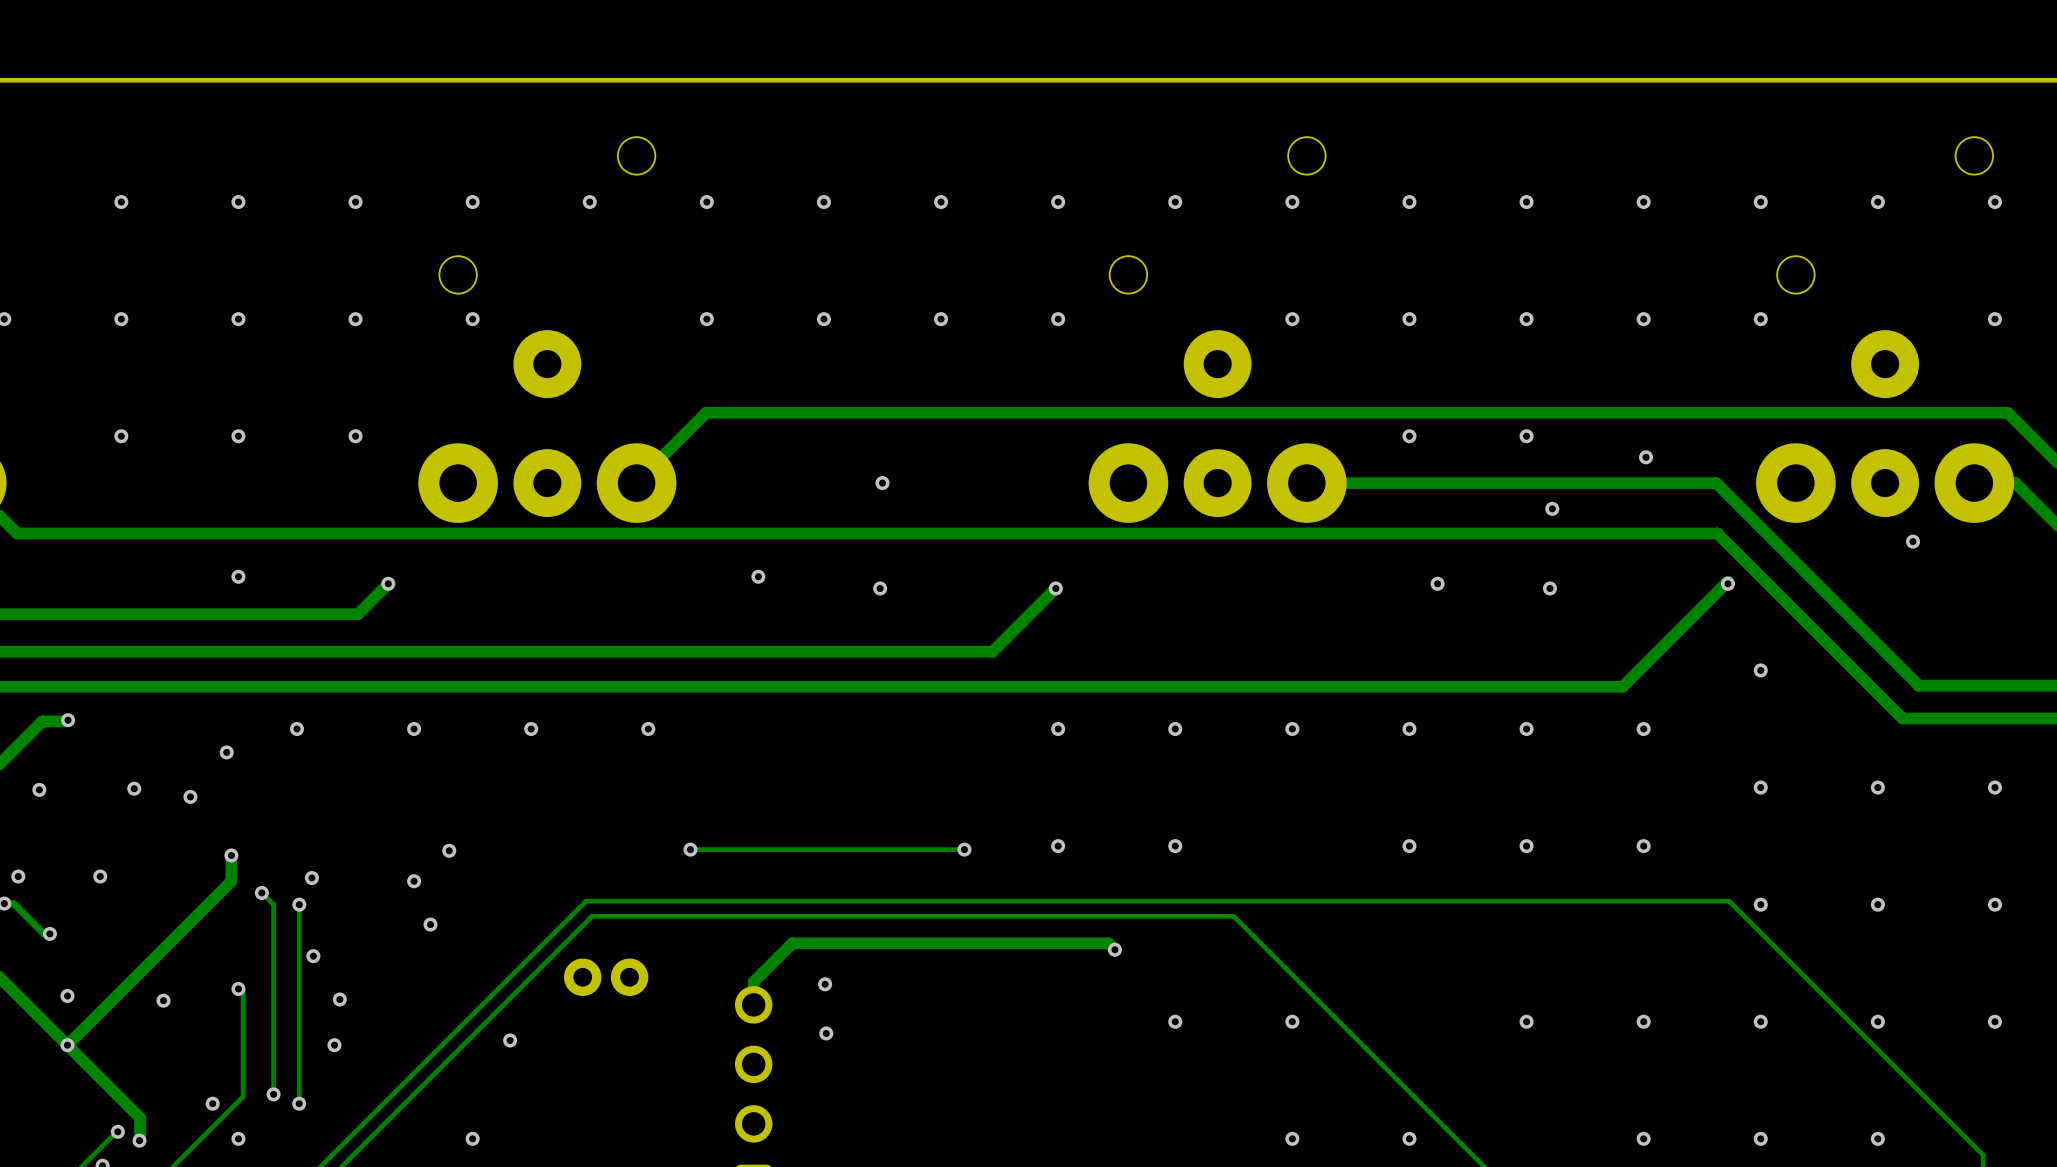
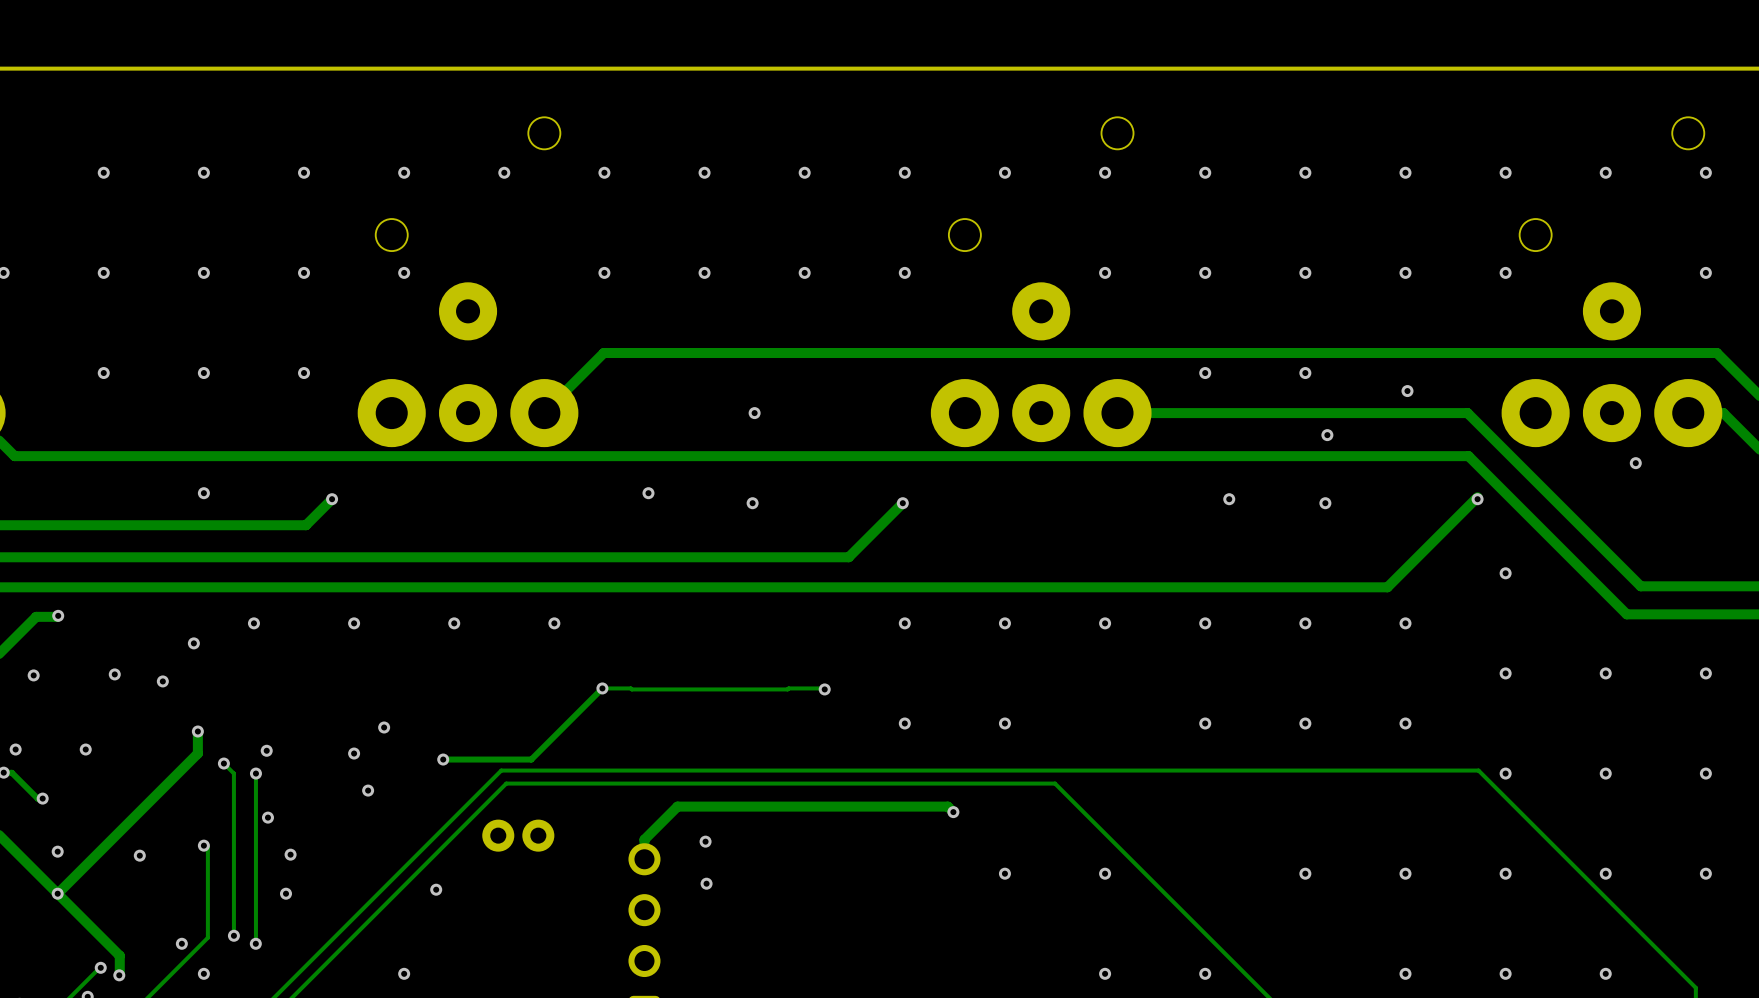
track: none -> (824, 689) (602, 688) (531, 759) (443, 759)
via position: (690, 849) -> (602, 688)
track: (964, 849) (690, 849) -> none
via position: (964, 849) -> (824, 689)
via: none -> (443, 759)

